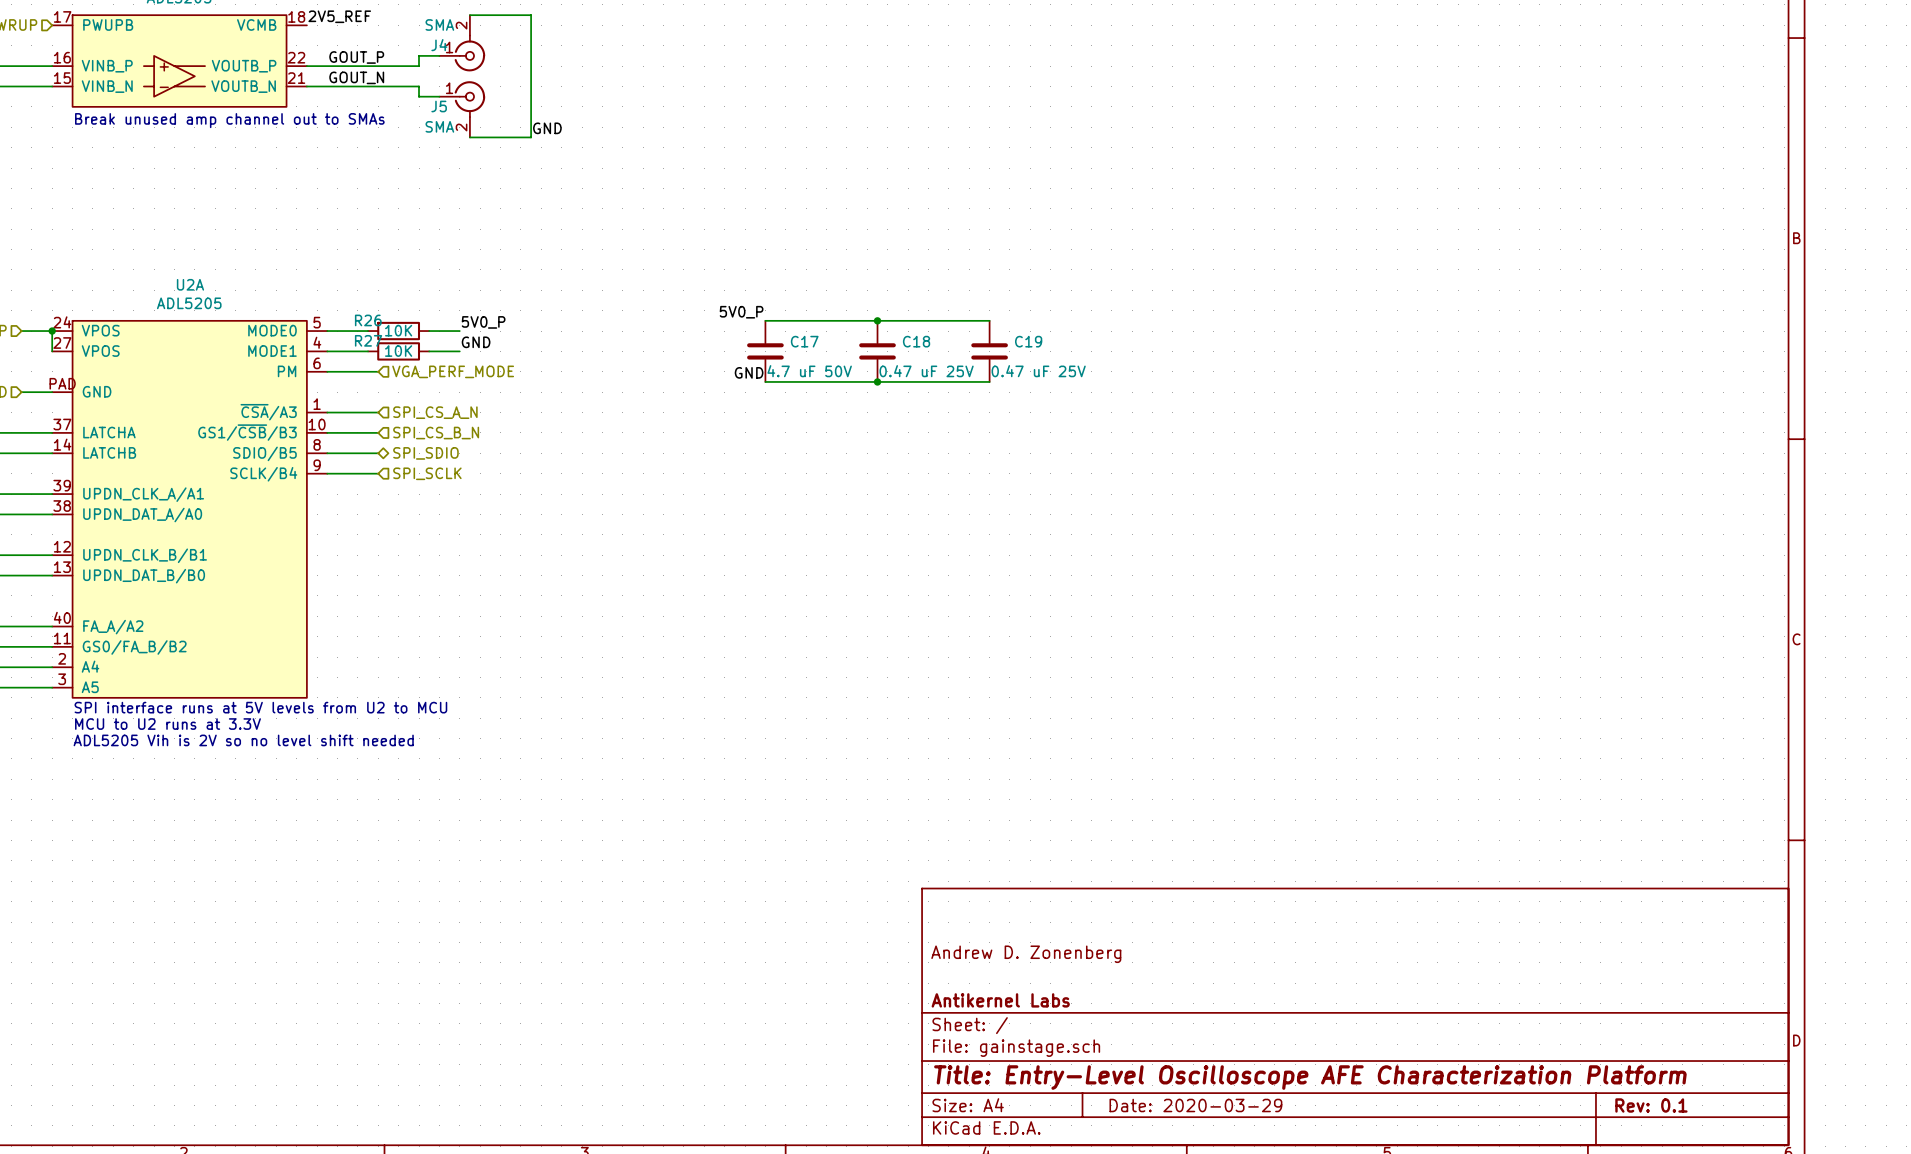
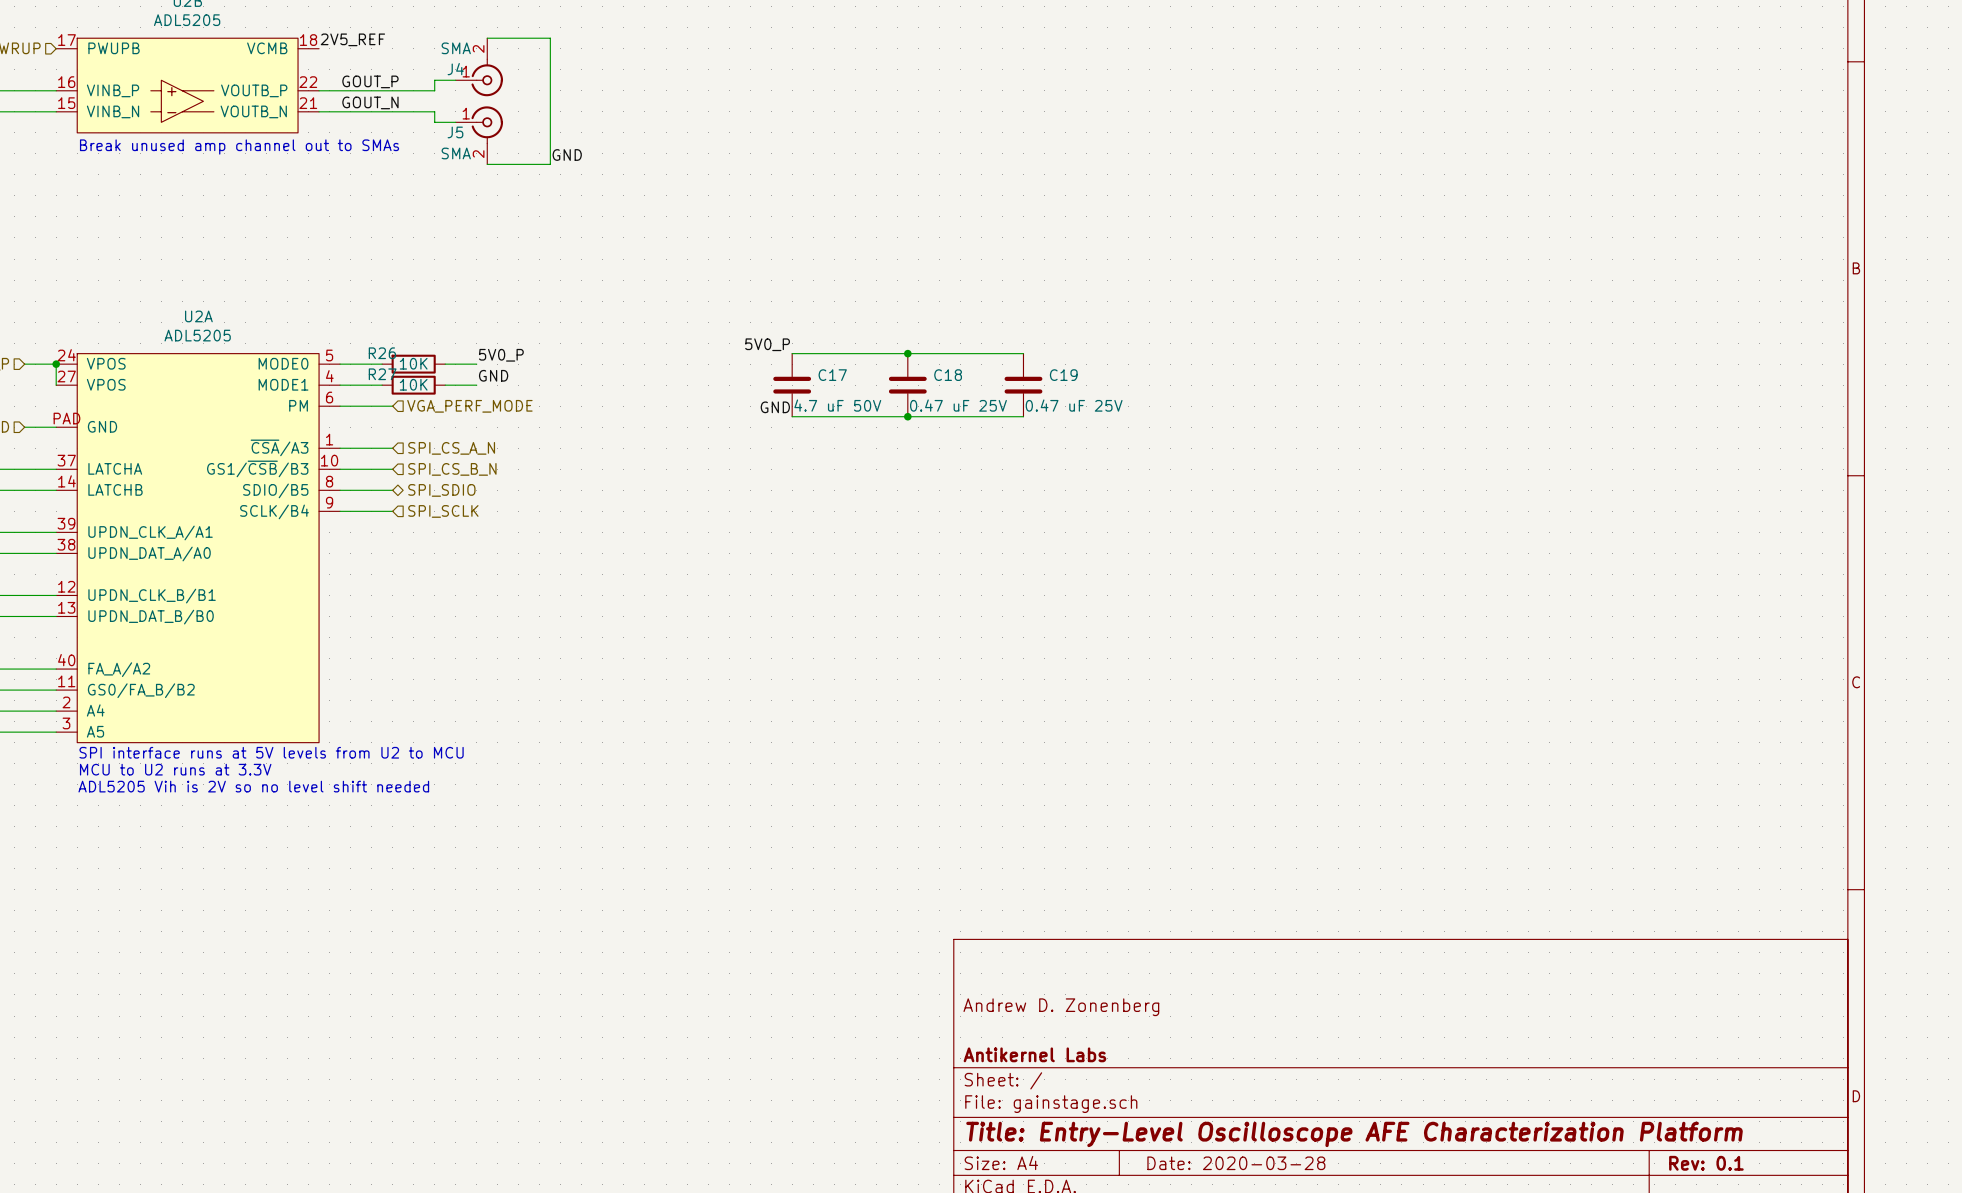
title block: Date: 2020-03-29 (1195, 1105) -> Date: 2020-03-28 (1236, 1163)

